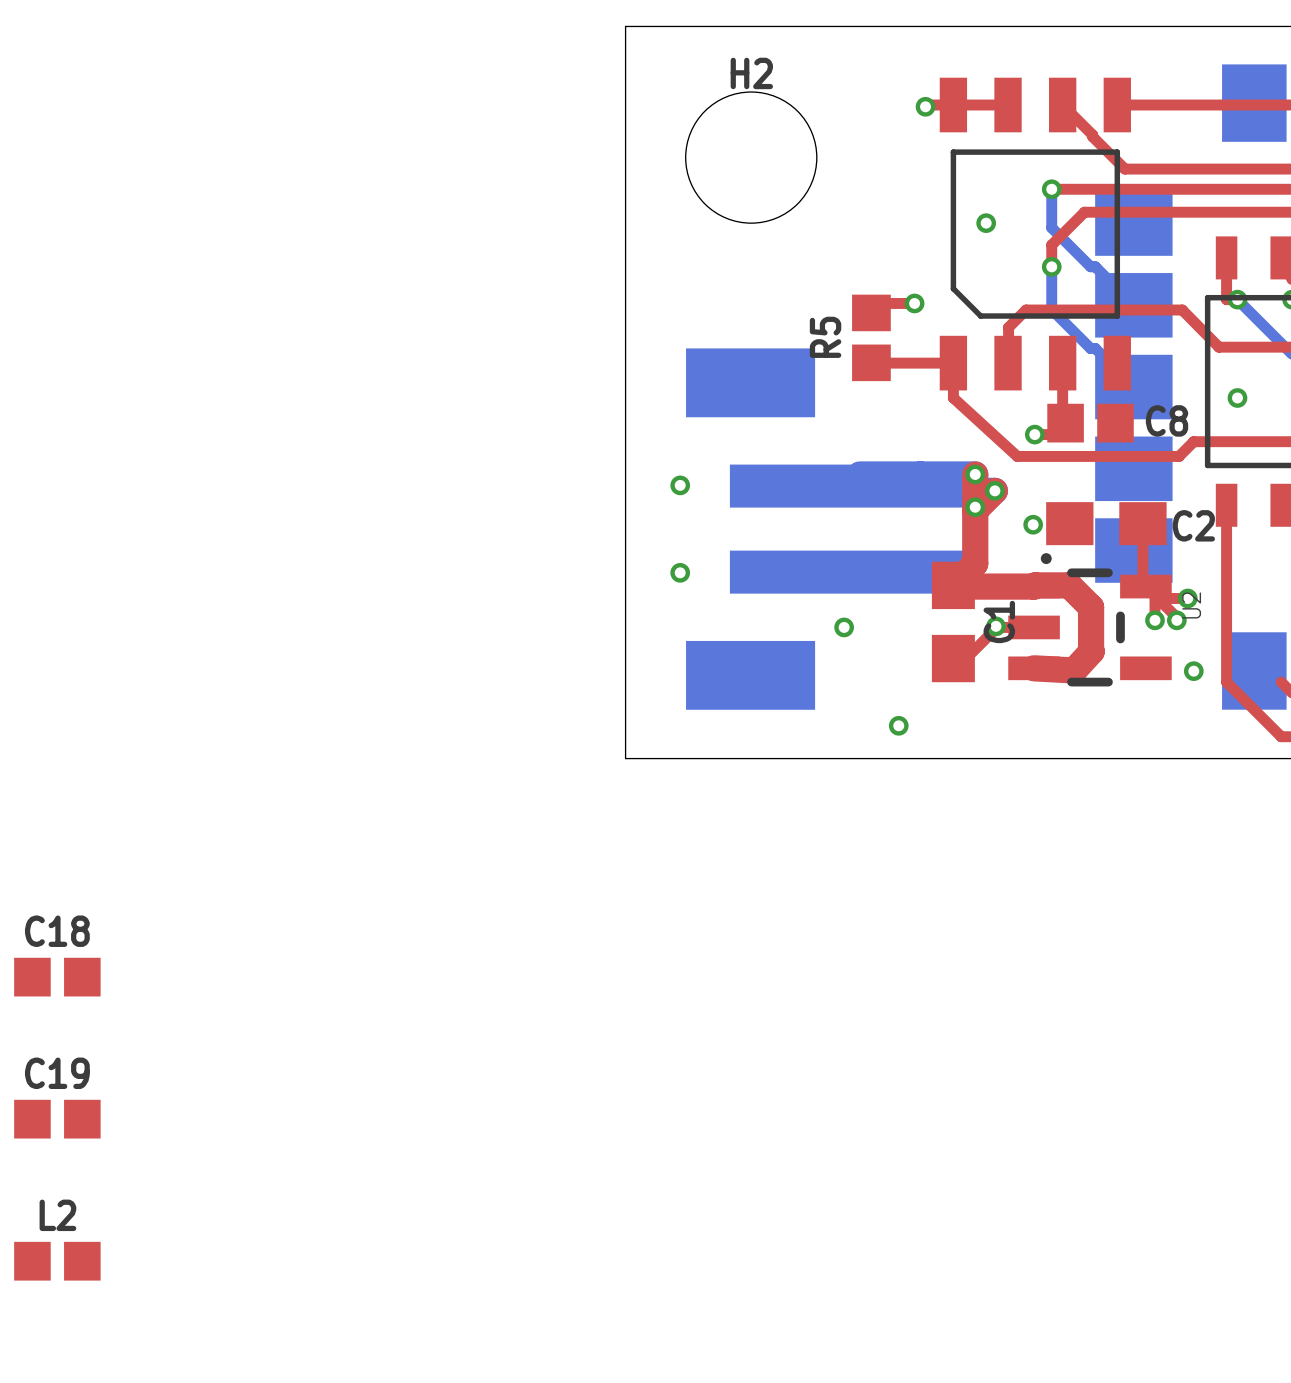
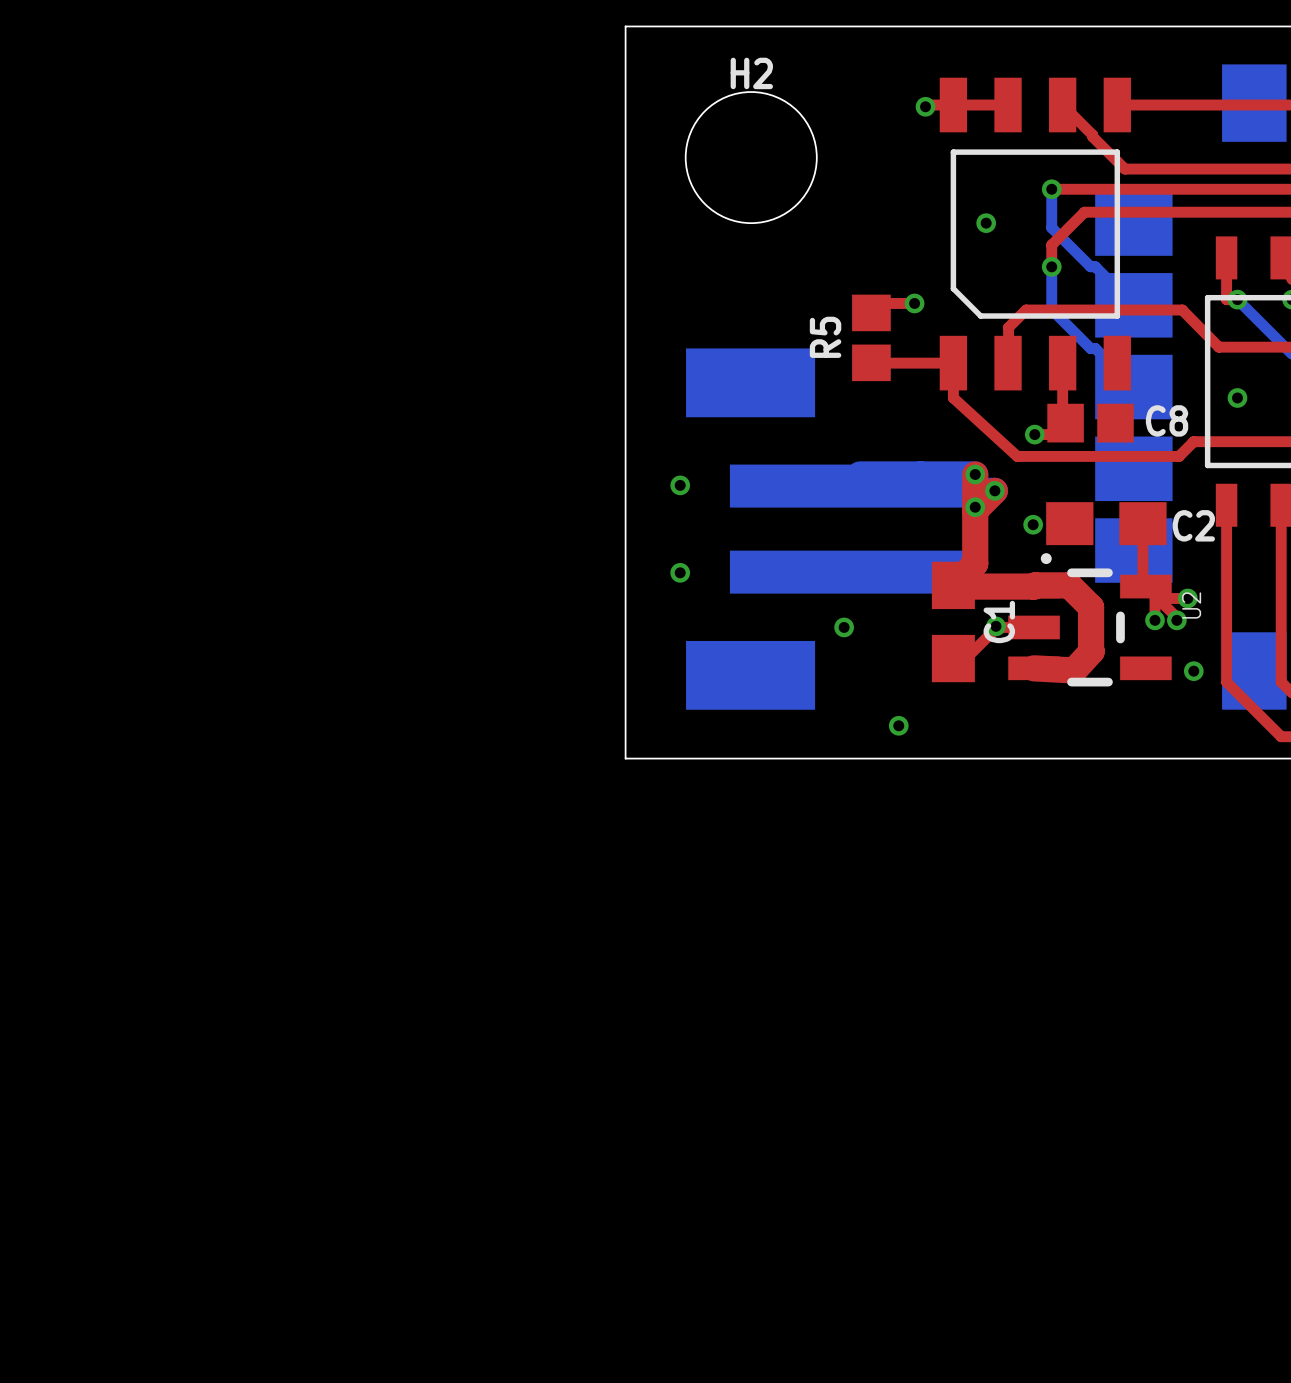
top track: none -> (1281, 505) (1281, 682)
C18: (57, 977) -> none
C19: (57, 1119) -> none
L2: (57, 1261) -> none

